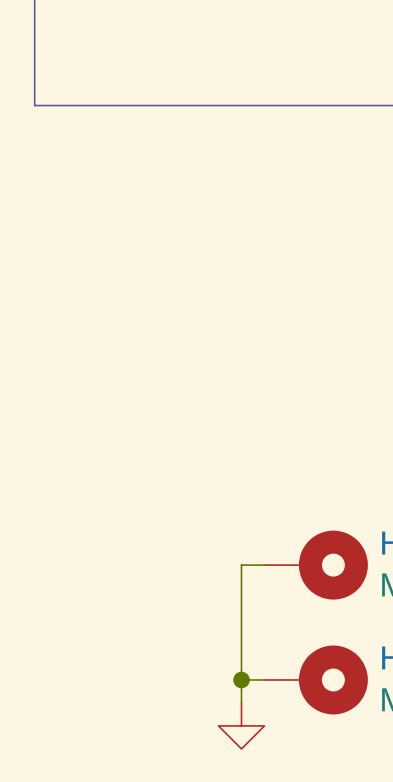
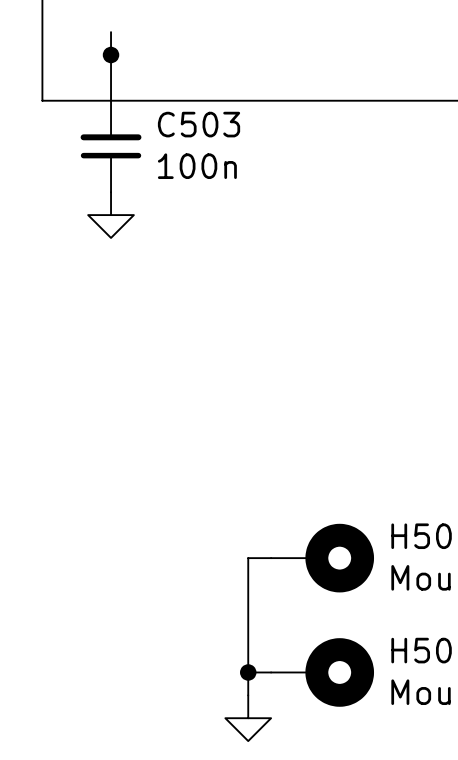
wire: none -> (111, 32) (111, 100)
junction: none -> (111, 54)
C503: none -> 100n (111, 146)
power symbol: none -> (111, 215)

